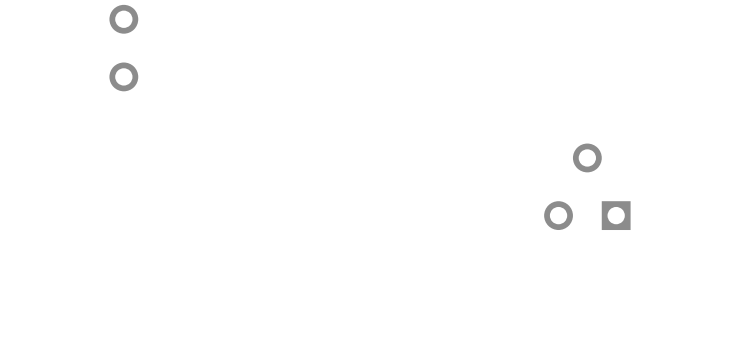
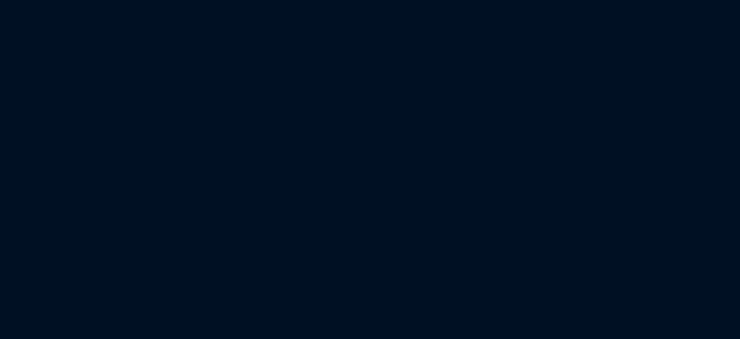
part: (123, 48) -> none
part: (587, 186) -> none

